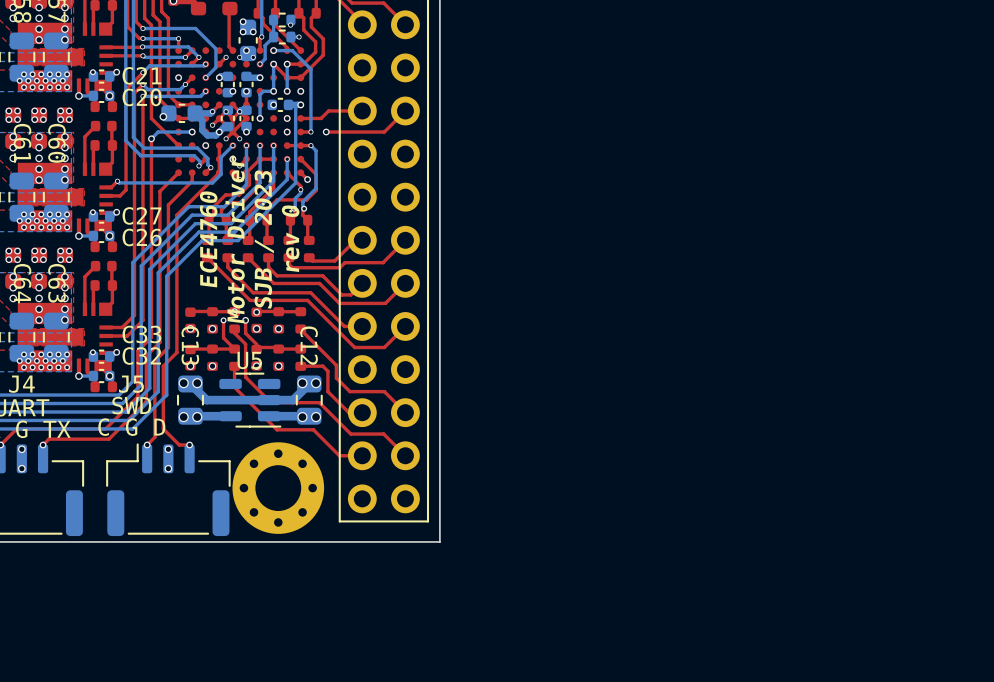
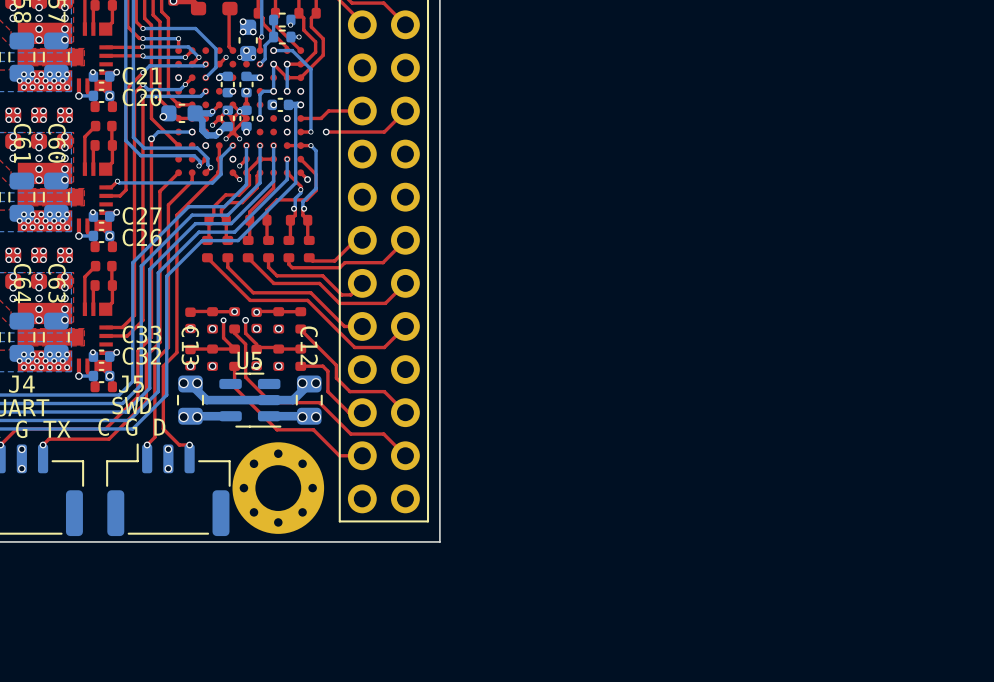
text: rev 0 (290, 238) -> none
text: ECE4760 (208, 239) -> none
text: Motor Driver (235, 239) -> none
text: SJB / 2023 (264, 239) -> none

